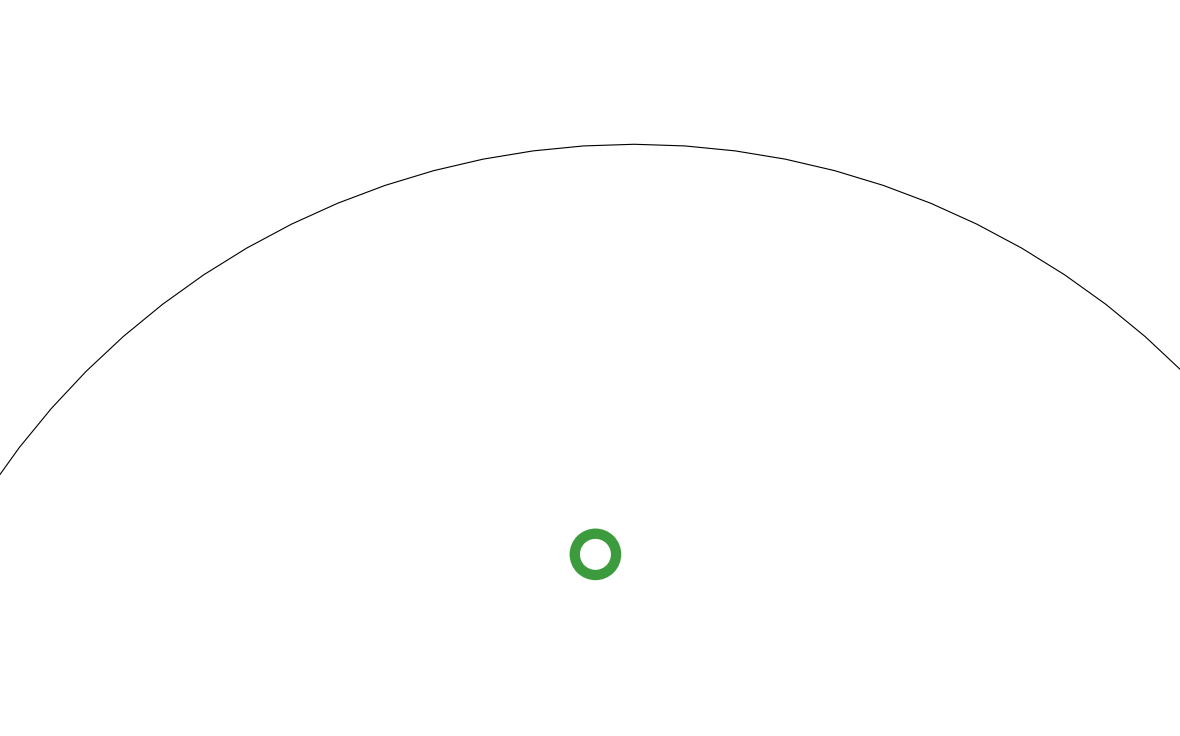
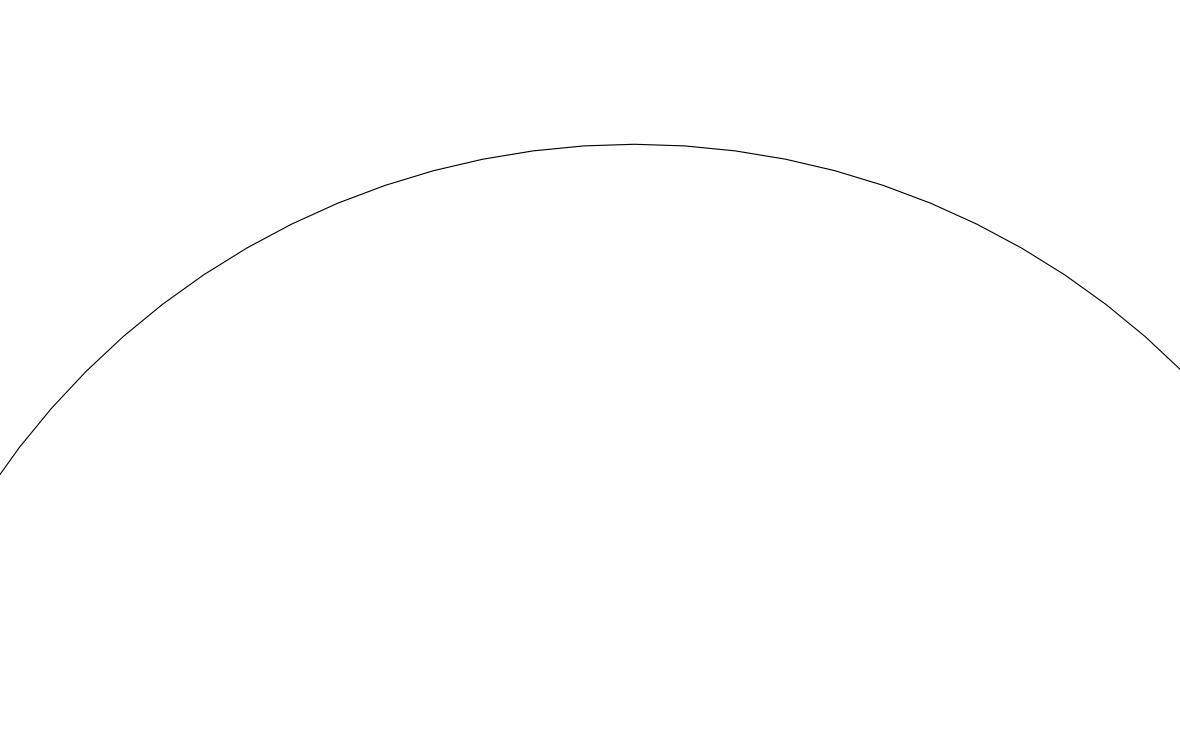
via: (595, 554) -> none

